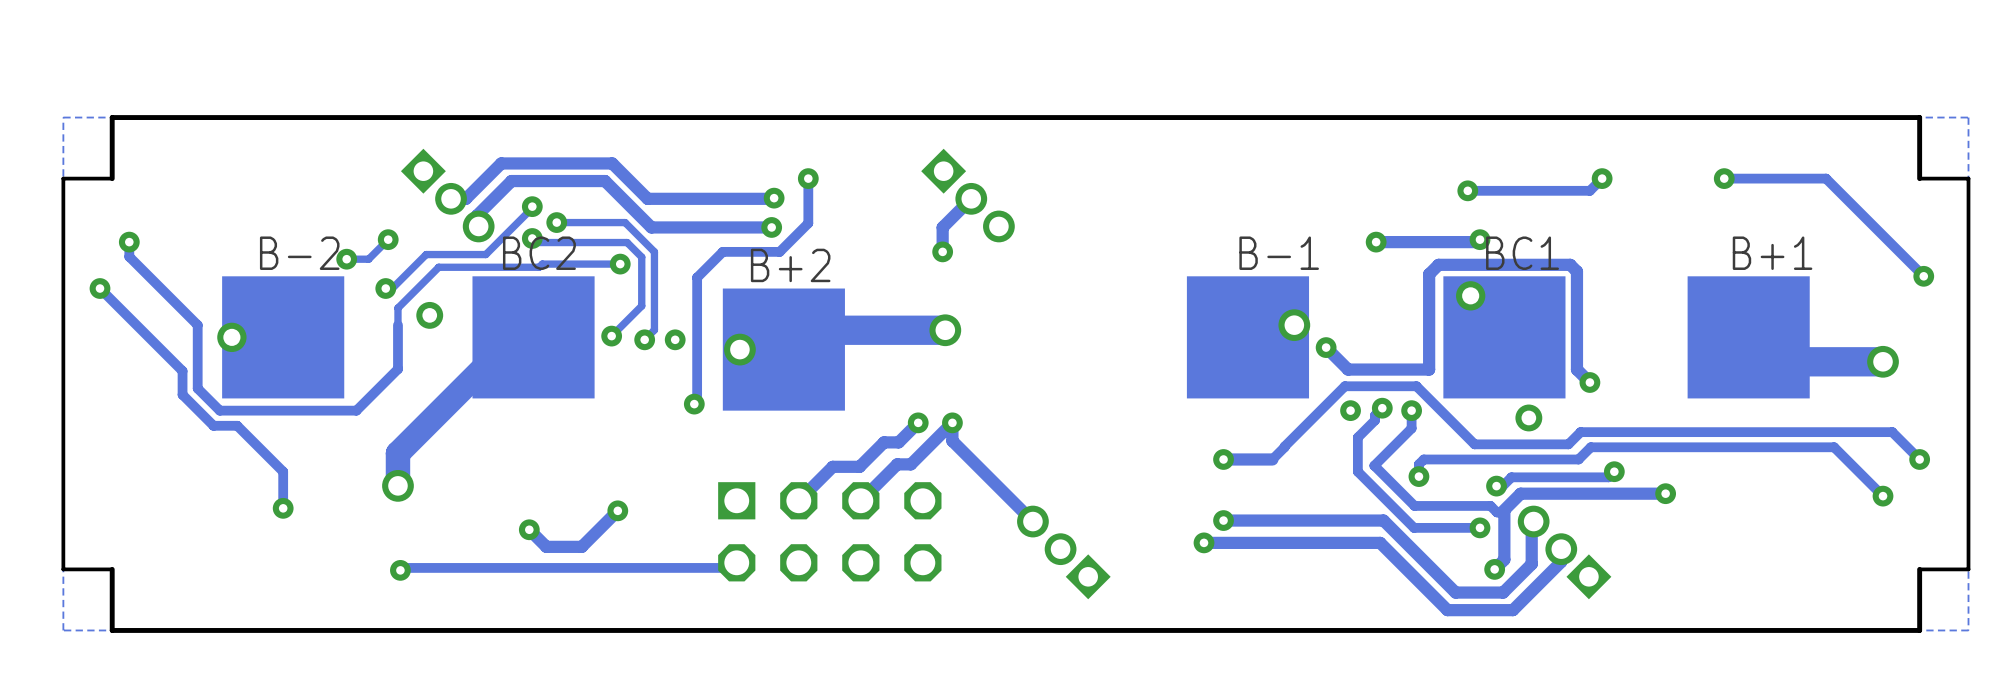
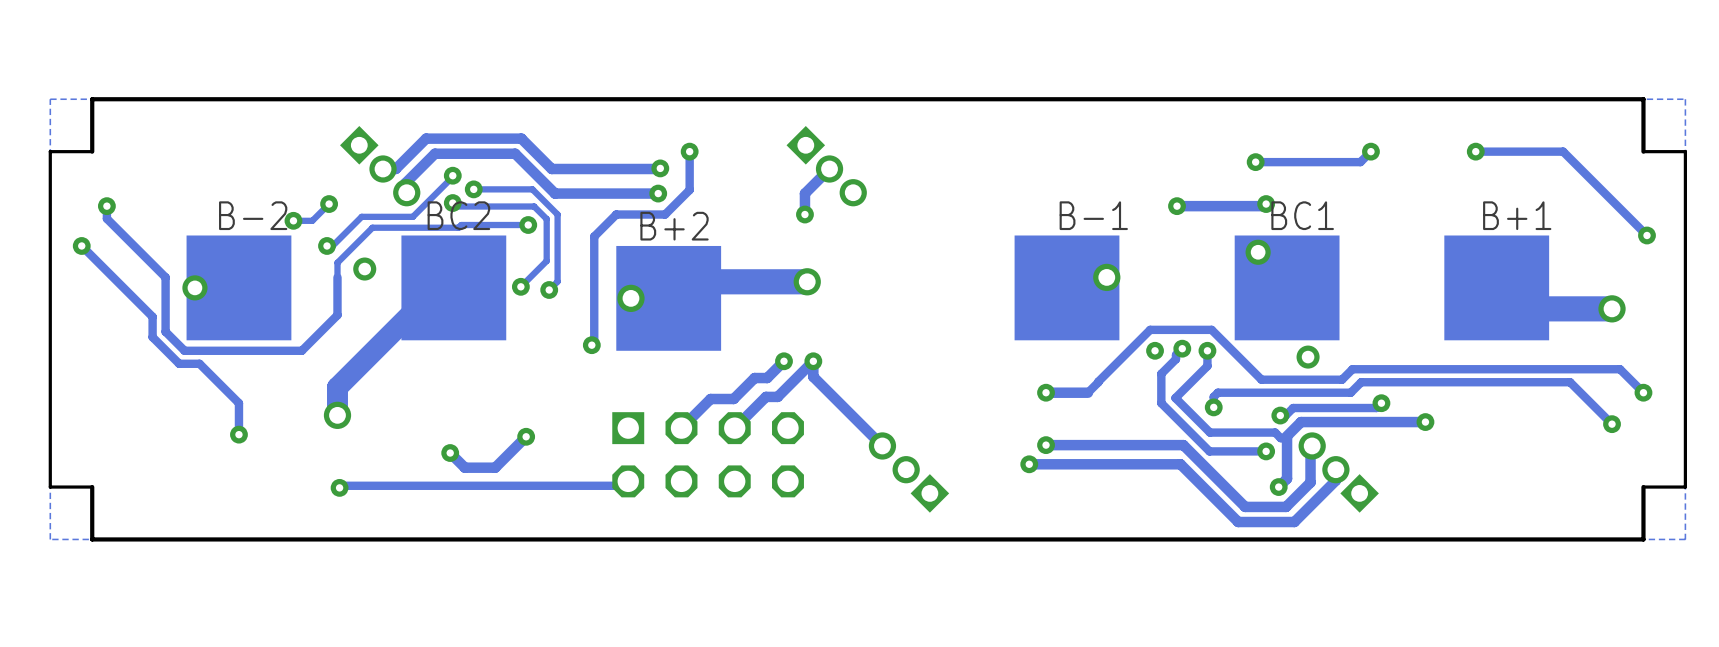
via: (675, 339) -> none
track: (1326, 347) (1348, 369) (1429, 369) (1429, 274) (1438, 264) (1570, 264) (1576, 271) (1576, 369) (1589, 382) -> none
via: (1326, 347) -> none
via: (1589, 382) -> none

